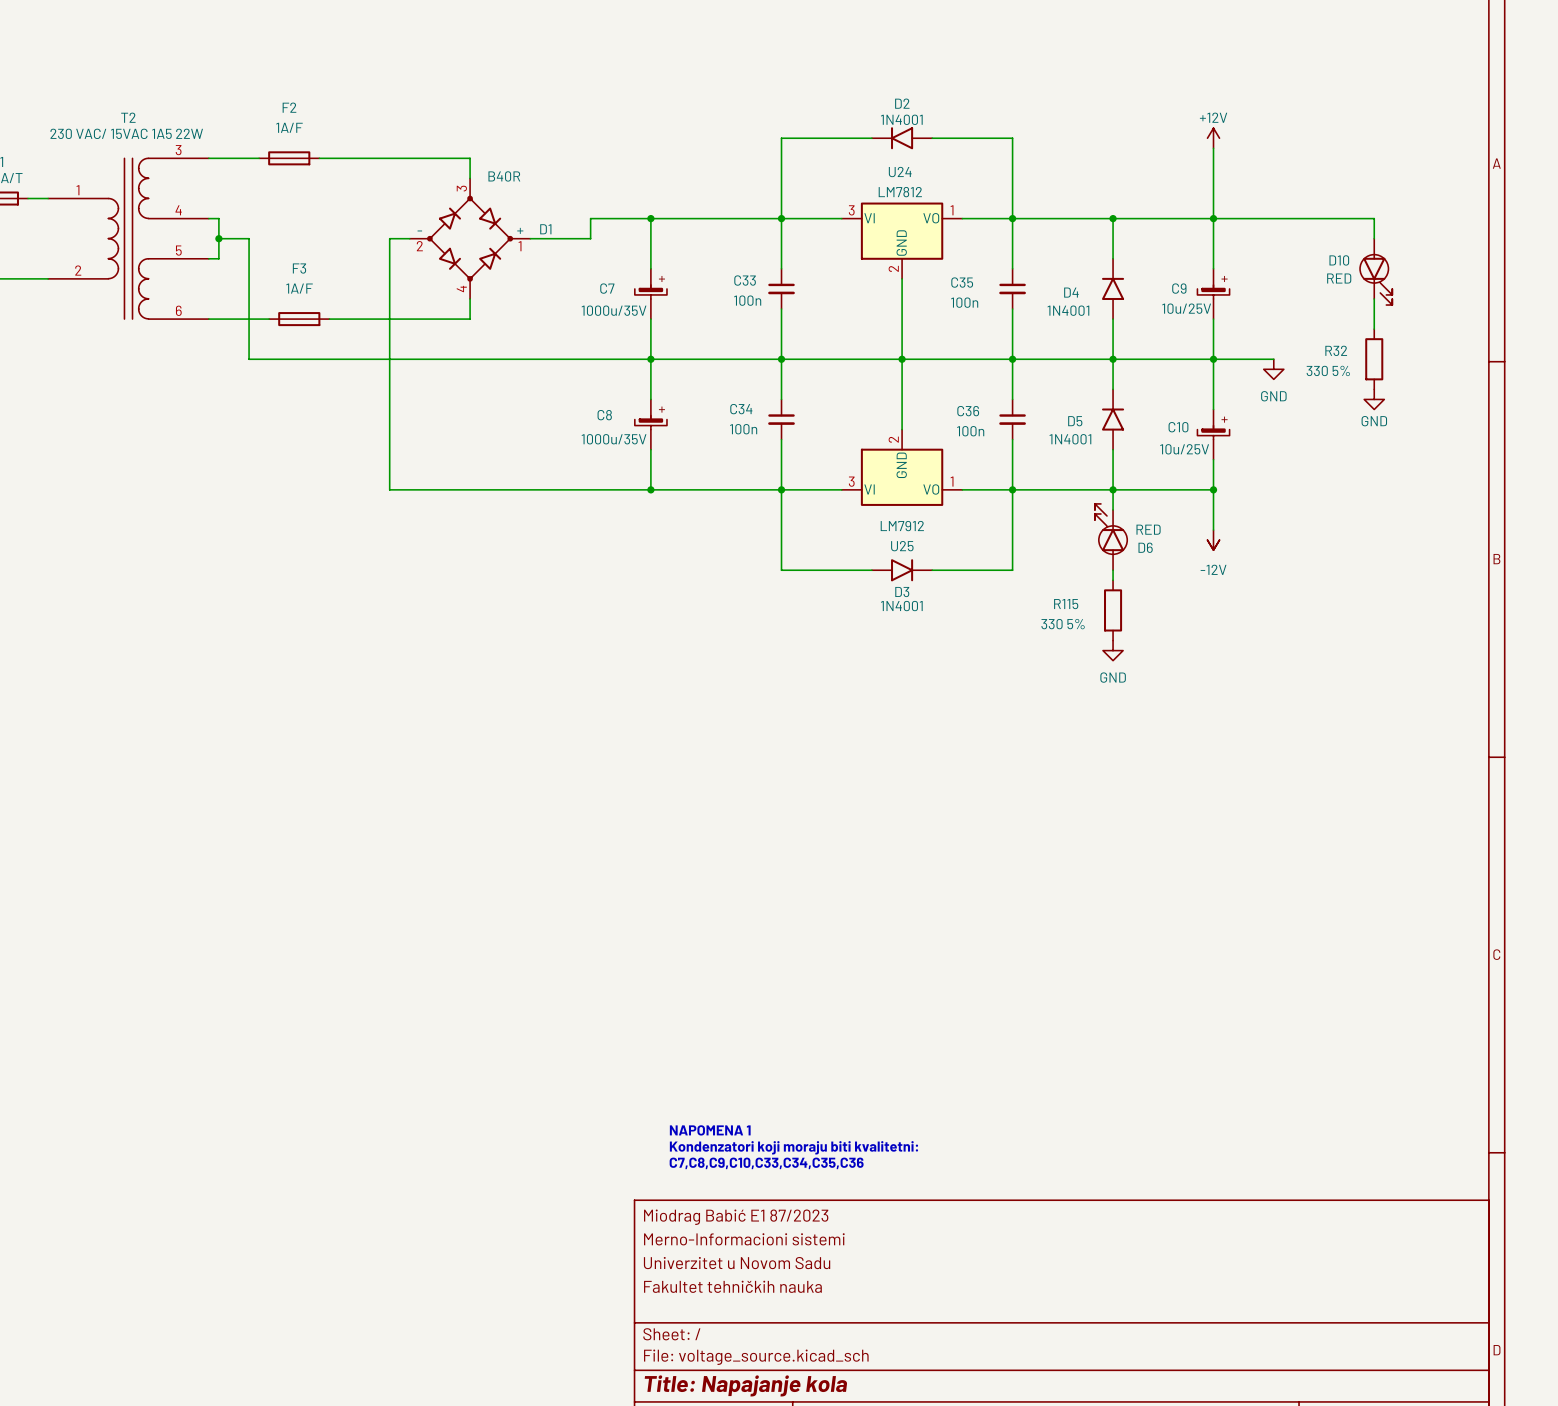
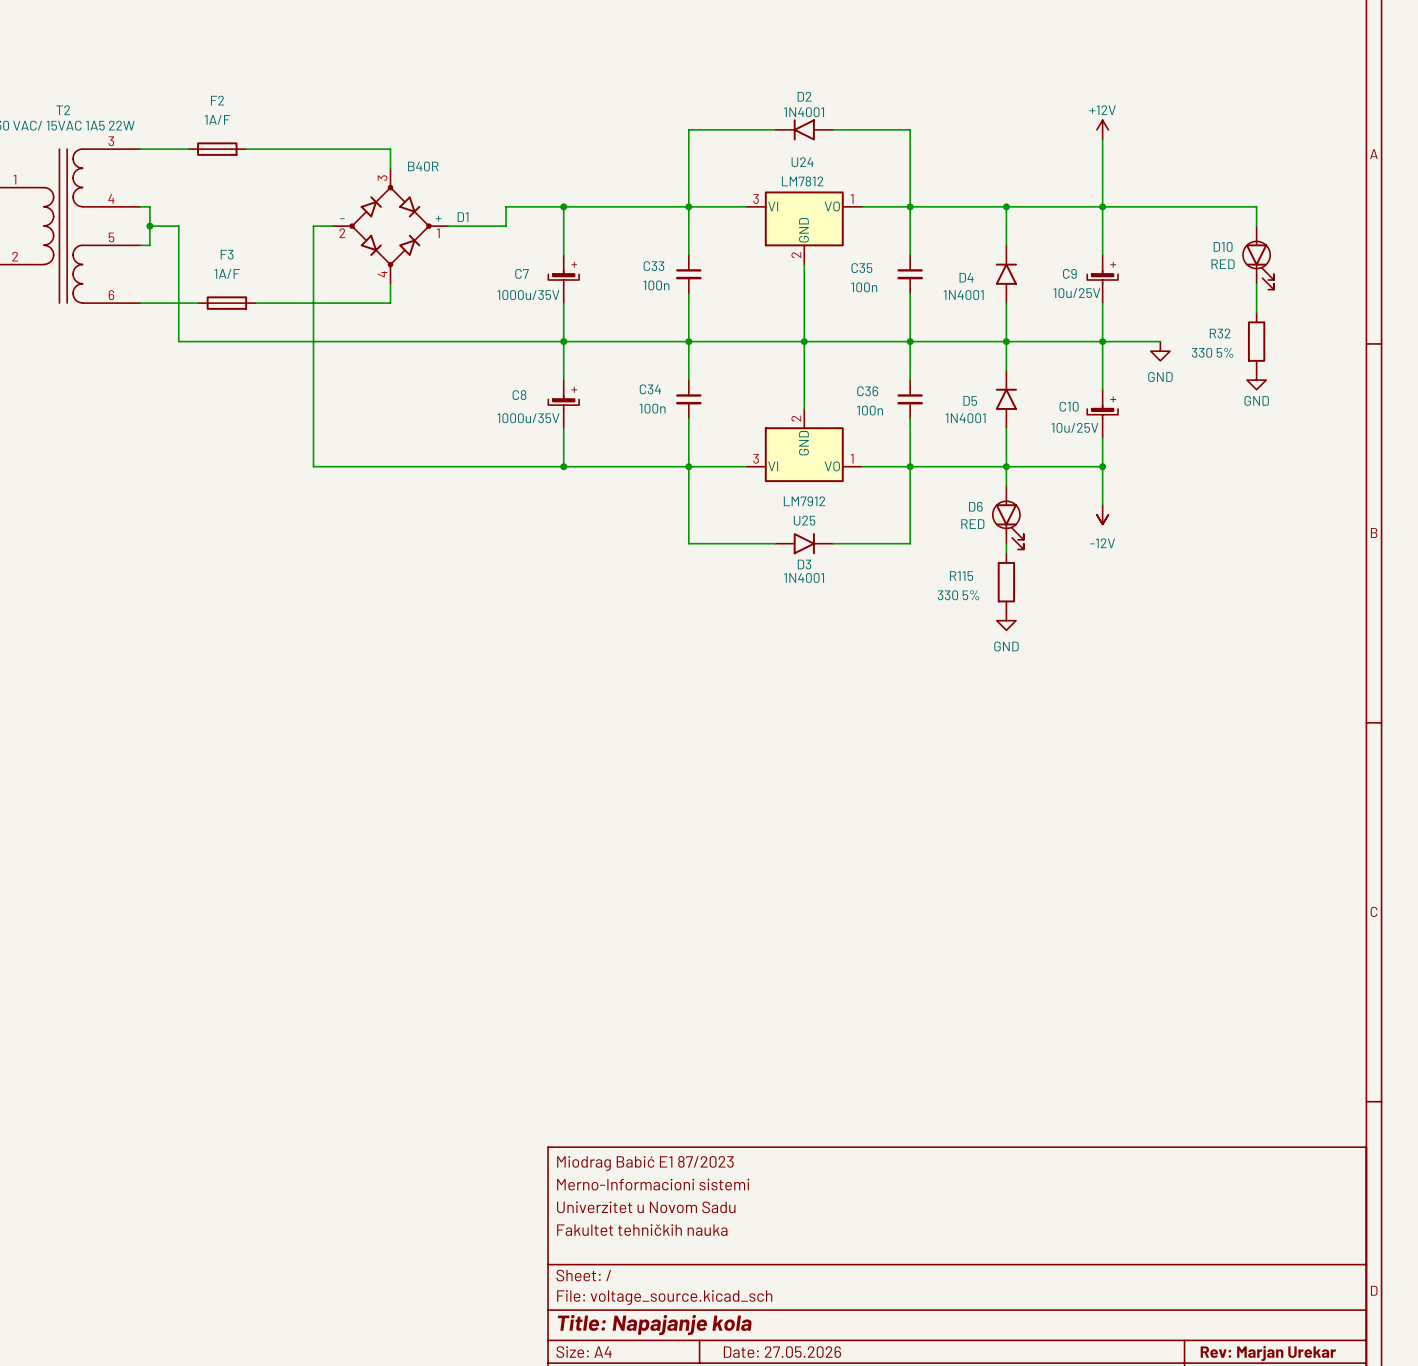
D6 rotation: 0° (1119, 529) -> 180° (1000, 525)
text: NAPOMENA 1 (710, 1130) -> none
text: Kondenzatori koji moraju biti kvalitetni: (793, 1147) -> none
text: C7,C8,C9,C10,C33,C34,C35,C36 (766, 1163) -> none

